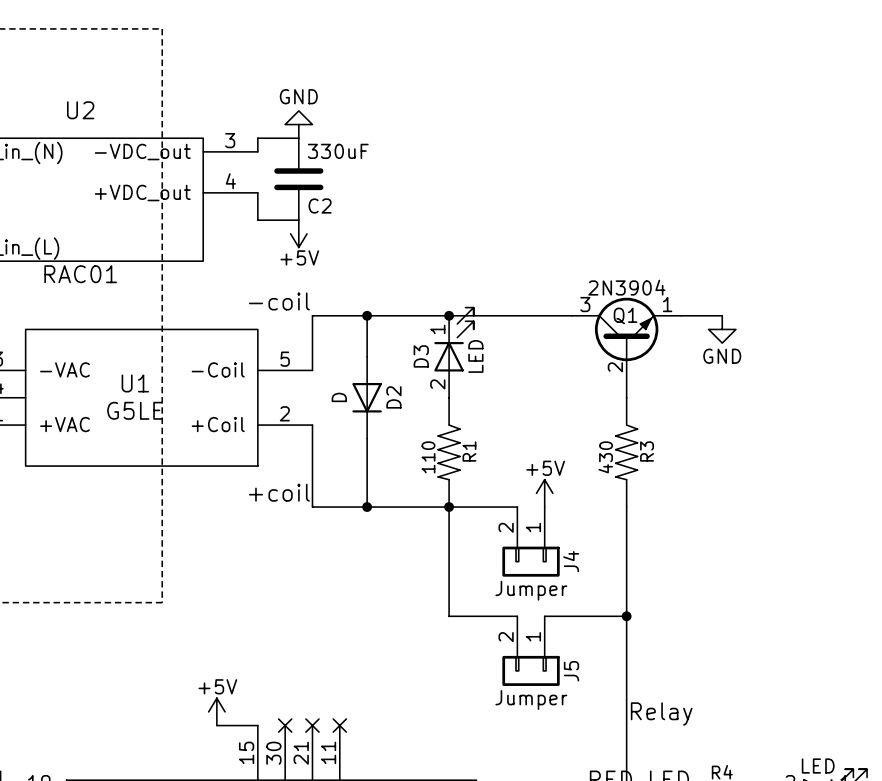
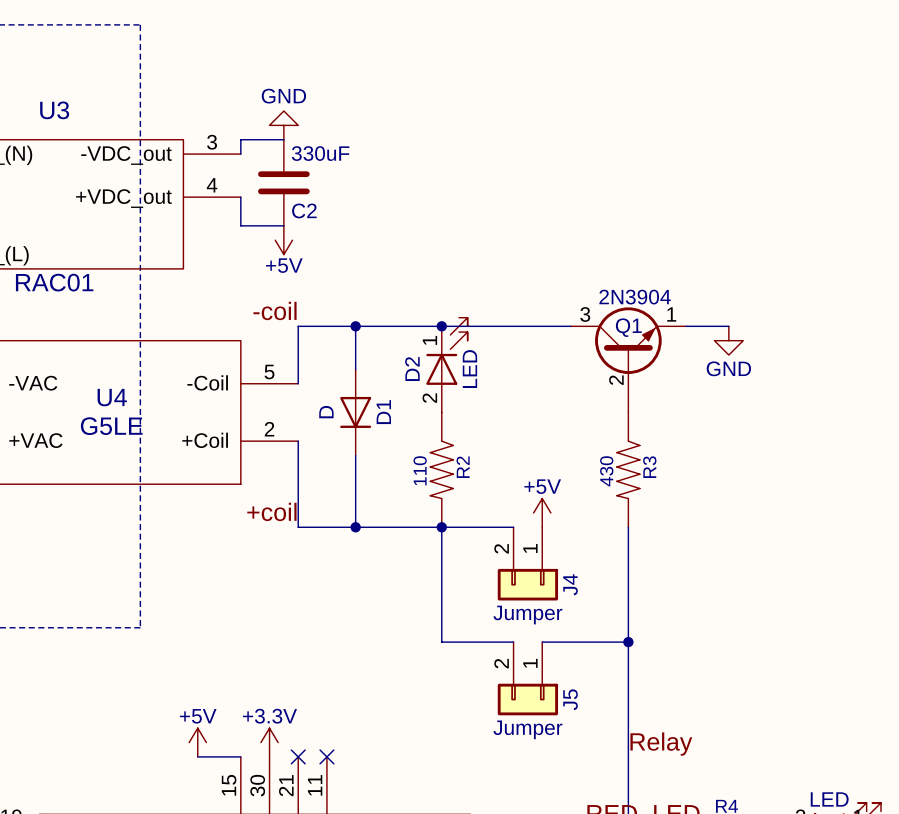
U2 name: U2 (80, 110) -> U3 (54, 110)
D3 name: D3 (421, 356) -> D2 (412, 369)
U1 name: U1 (135, 383) -> U4 (112, 397)
D2 name: D2 (393, 397) -> D1 (383, 412)
R1 name: R1 (469, 451) -> R2 (463, 467)
power symbol: none -> +3.3V (269, 742)
no-connect mark: (285, 725) -> none

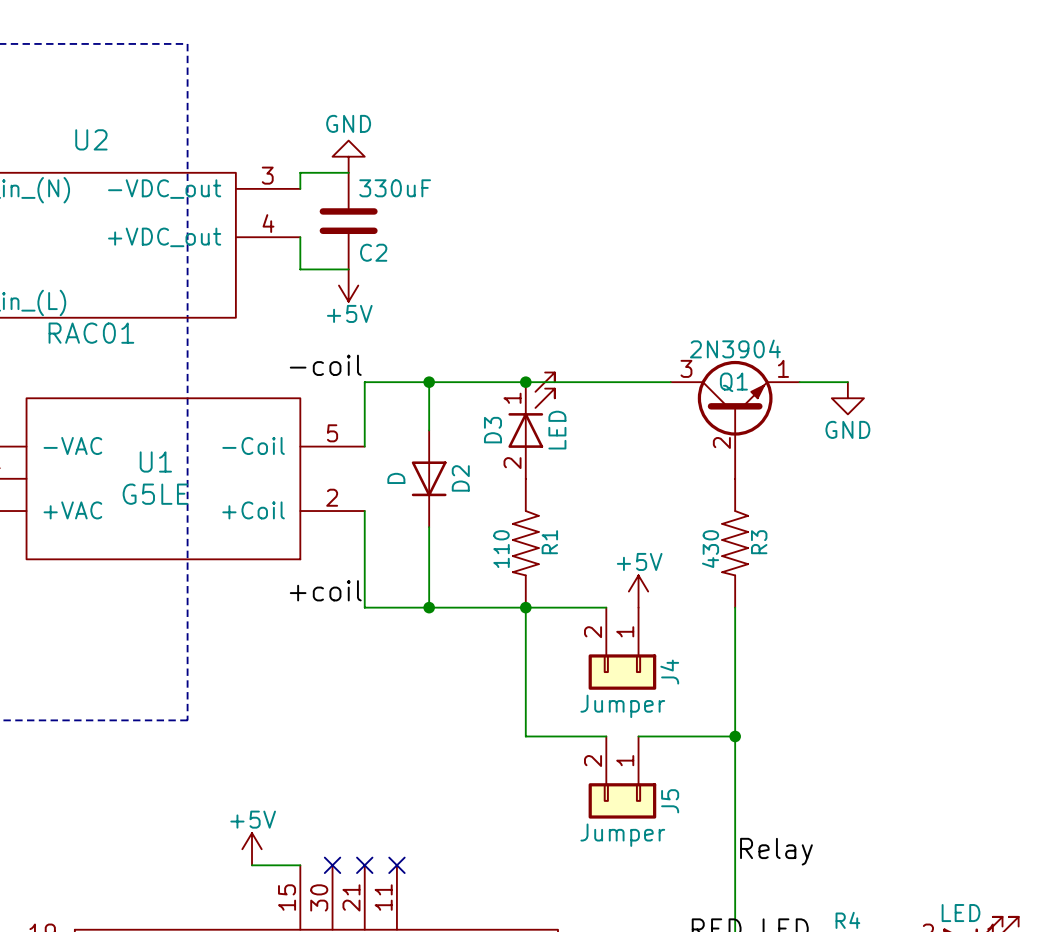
U3 name: U3 (54, 110) -> U2 (91, 139)
D2 name: D2 (412, 369) -> D3 (492, 430)
U4 name: U4 (112, 397) -> U1 (155, 461)
D1 name: D1 (383, 412) -> D2 (460, 478)
R2 name: R2 (463, 467) -> R1 (549, 542)
power symbol: +3.3V (269, 742) -> none
no-connect mark: none -> (332, 865)

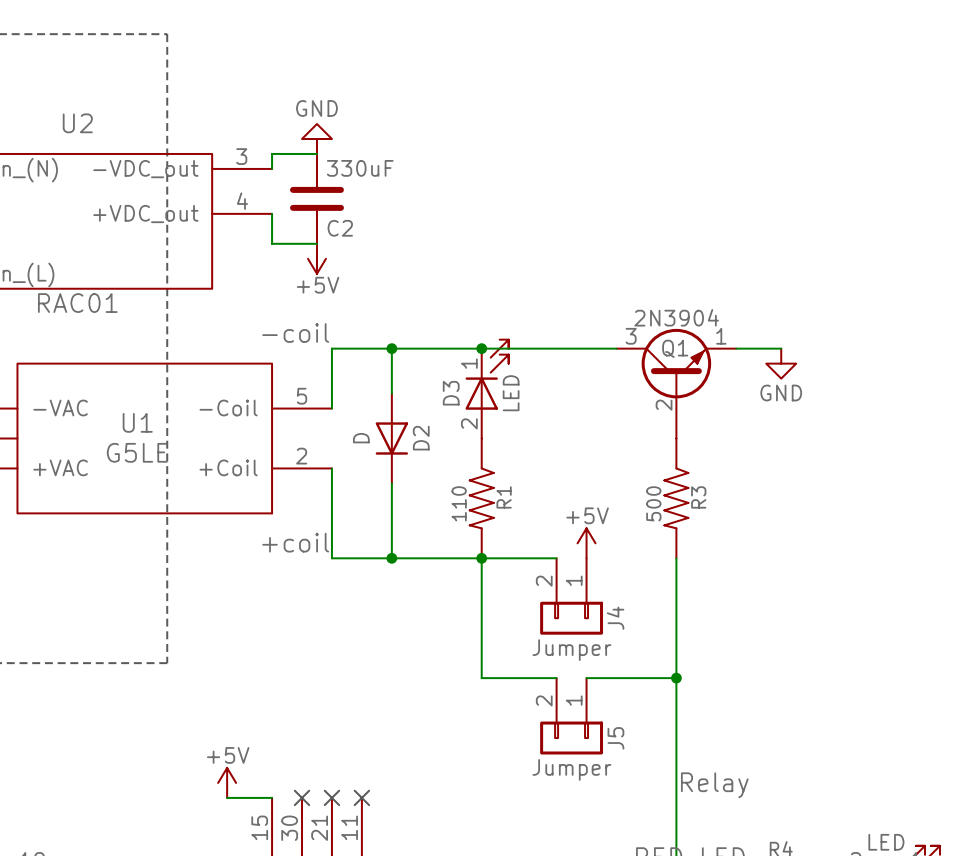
R3 value: 430 (710, 549) -> 500 (653, 503)

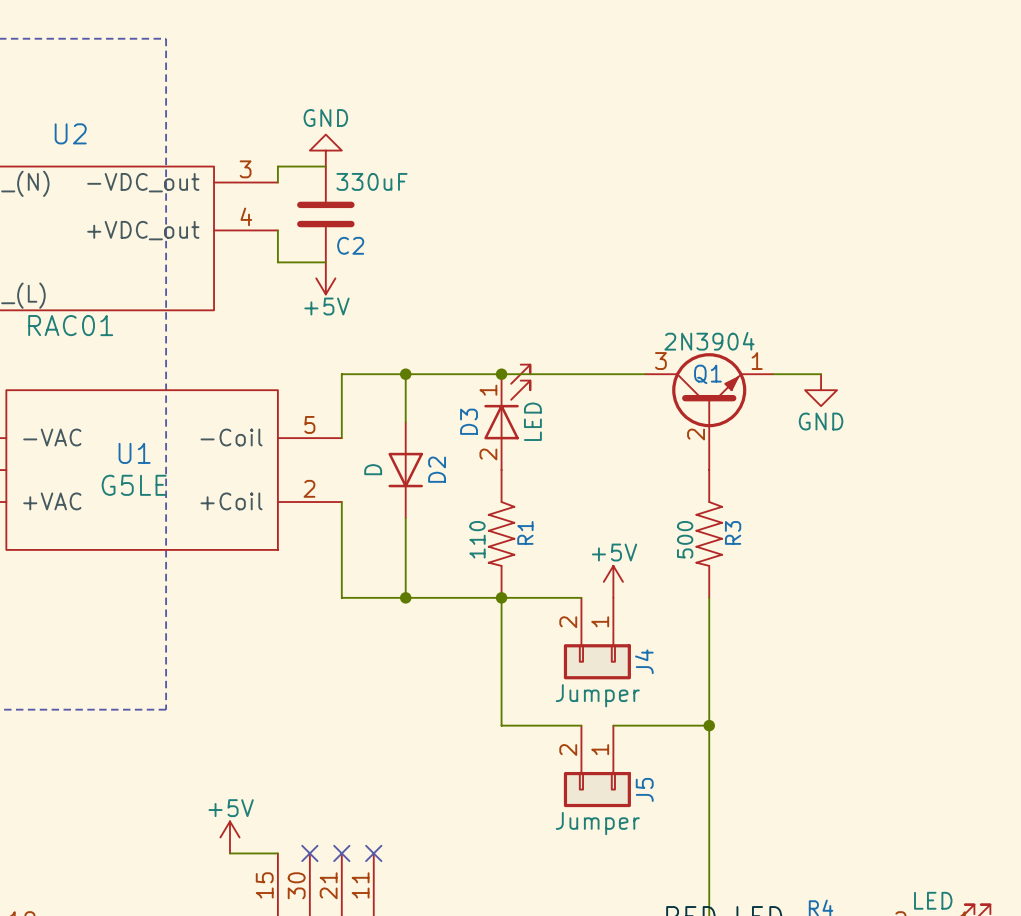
label: -coil (295, 332) -> none
label: +coil (295, 542) -> none
label: Relay (714, 785) -> none

